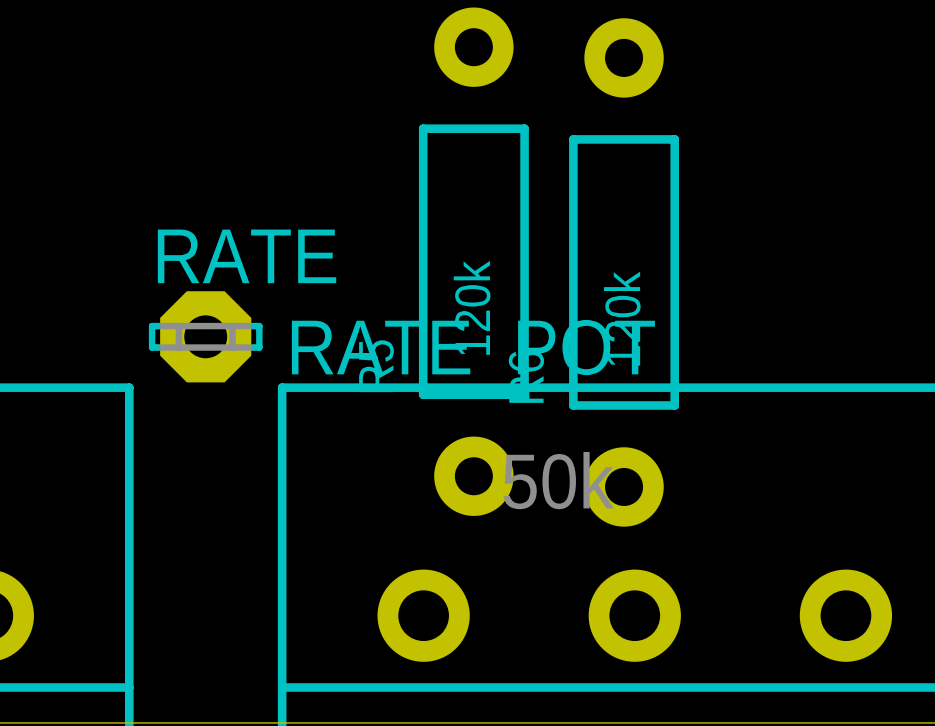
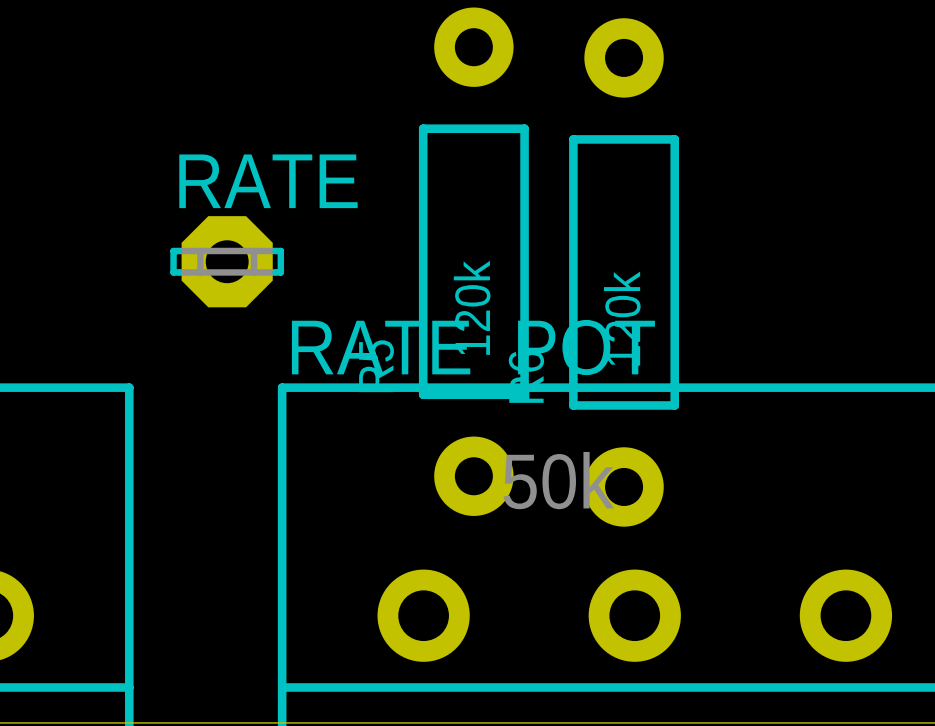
RATE position: (205, 336) -> (227, 261)

